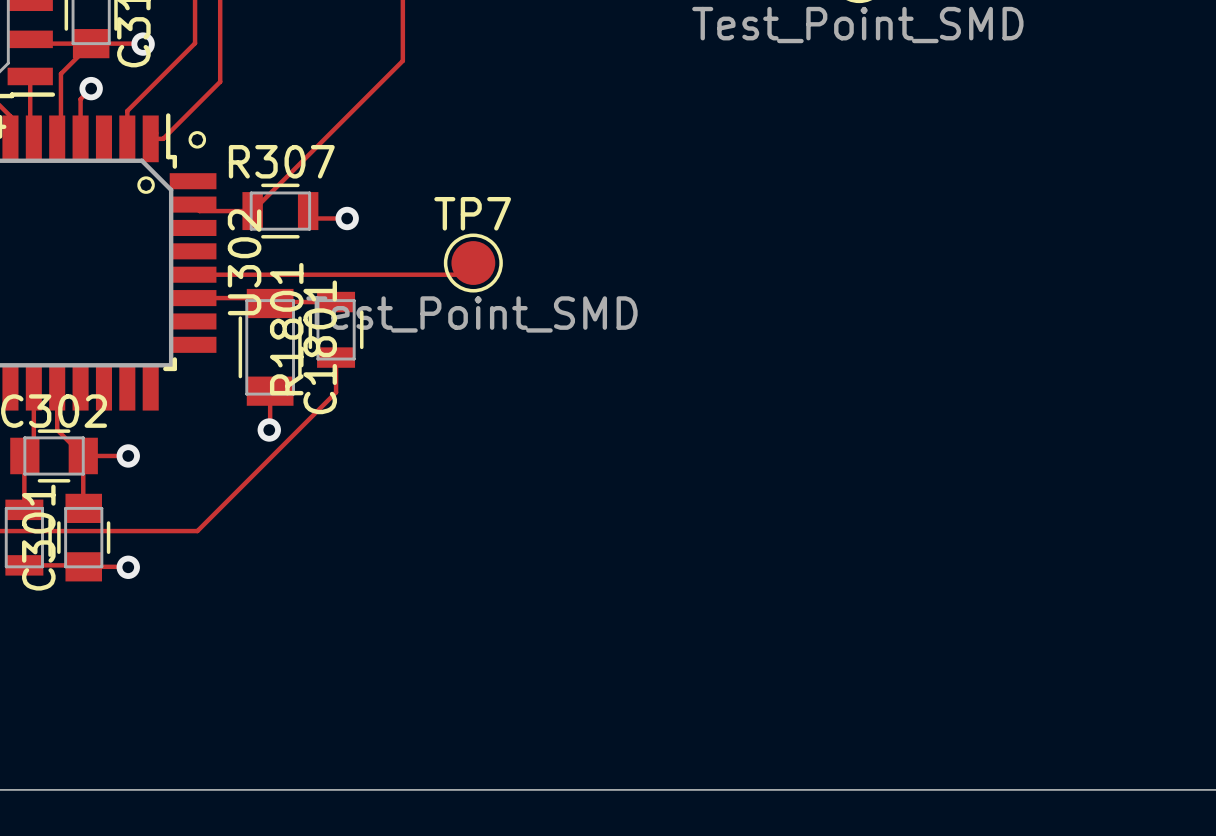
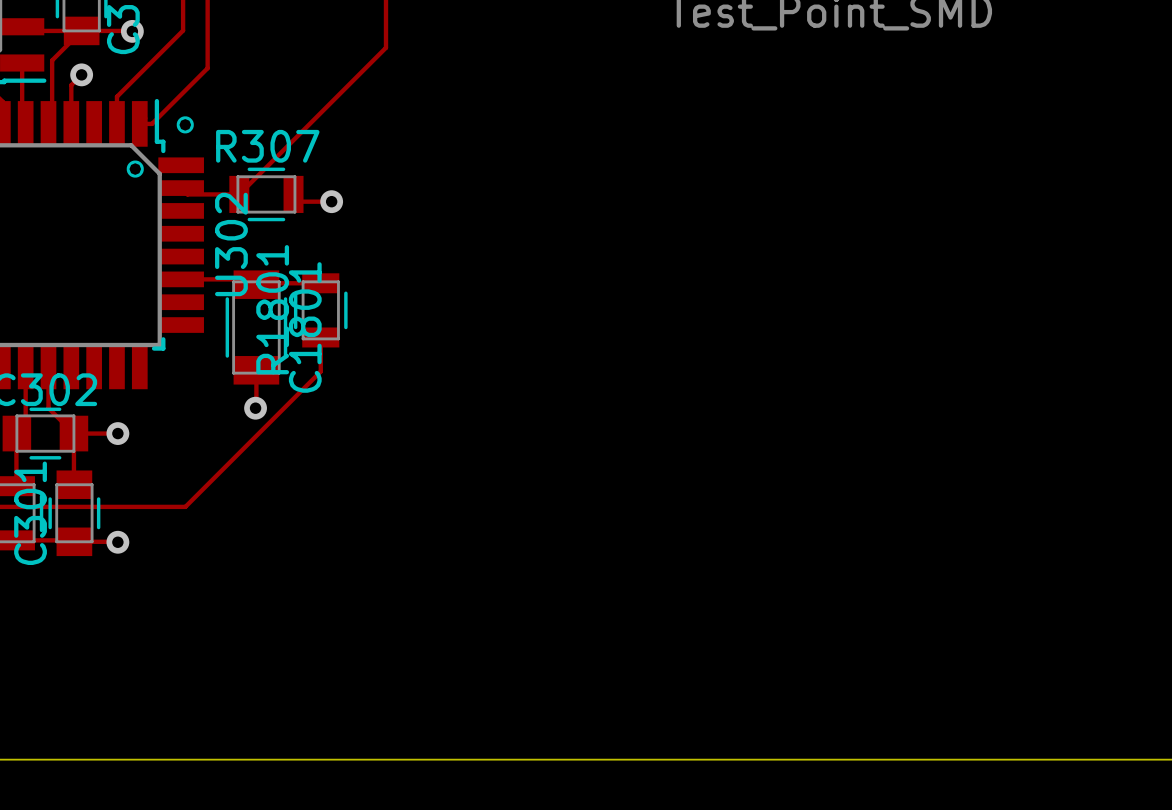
track: (473, 263) (461, 274) (193, 274) -> none
TP7: Test_Point_SMD (473, 263) -> none

